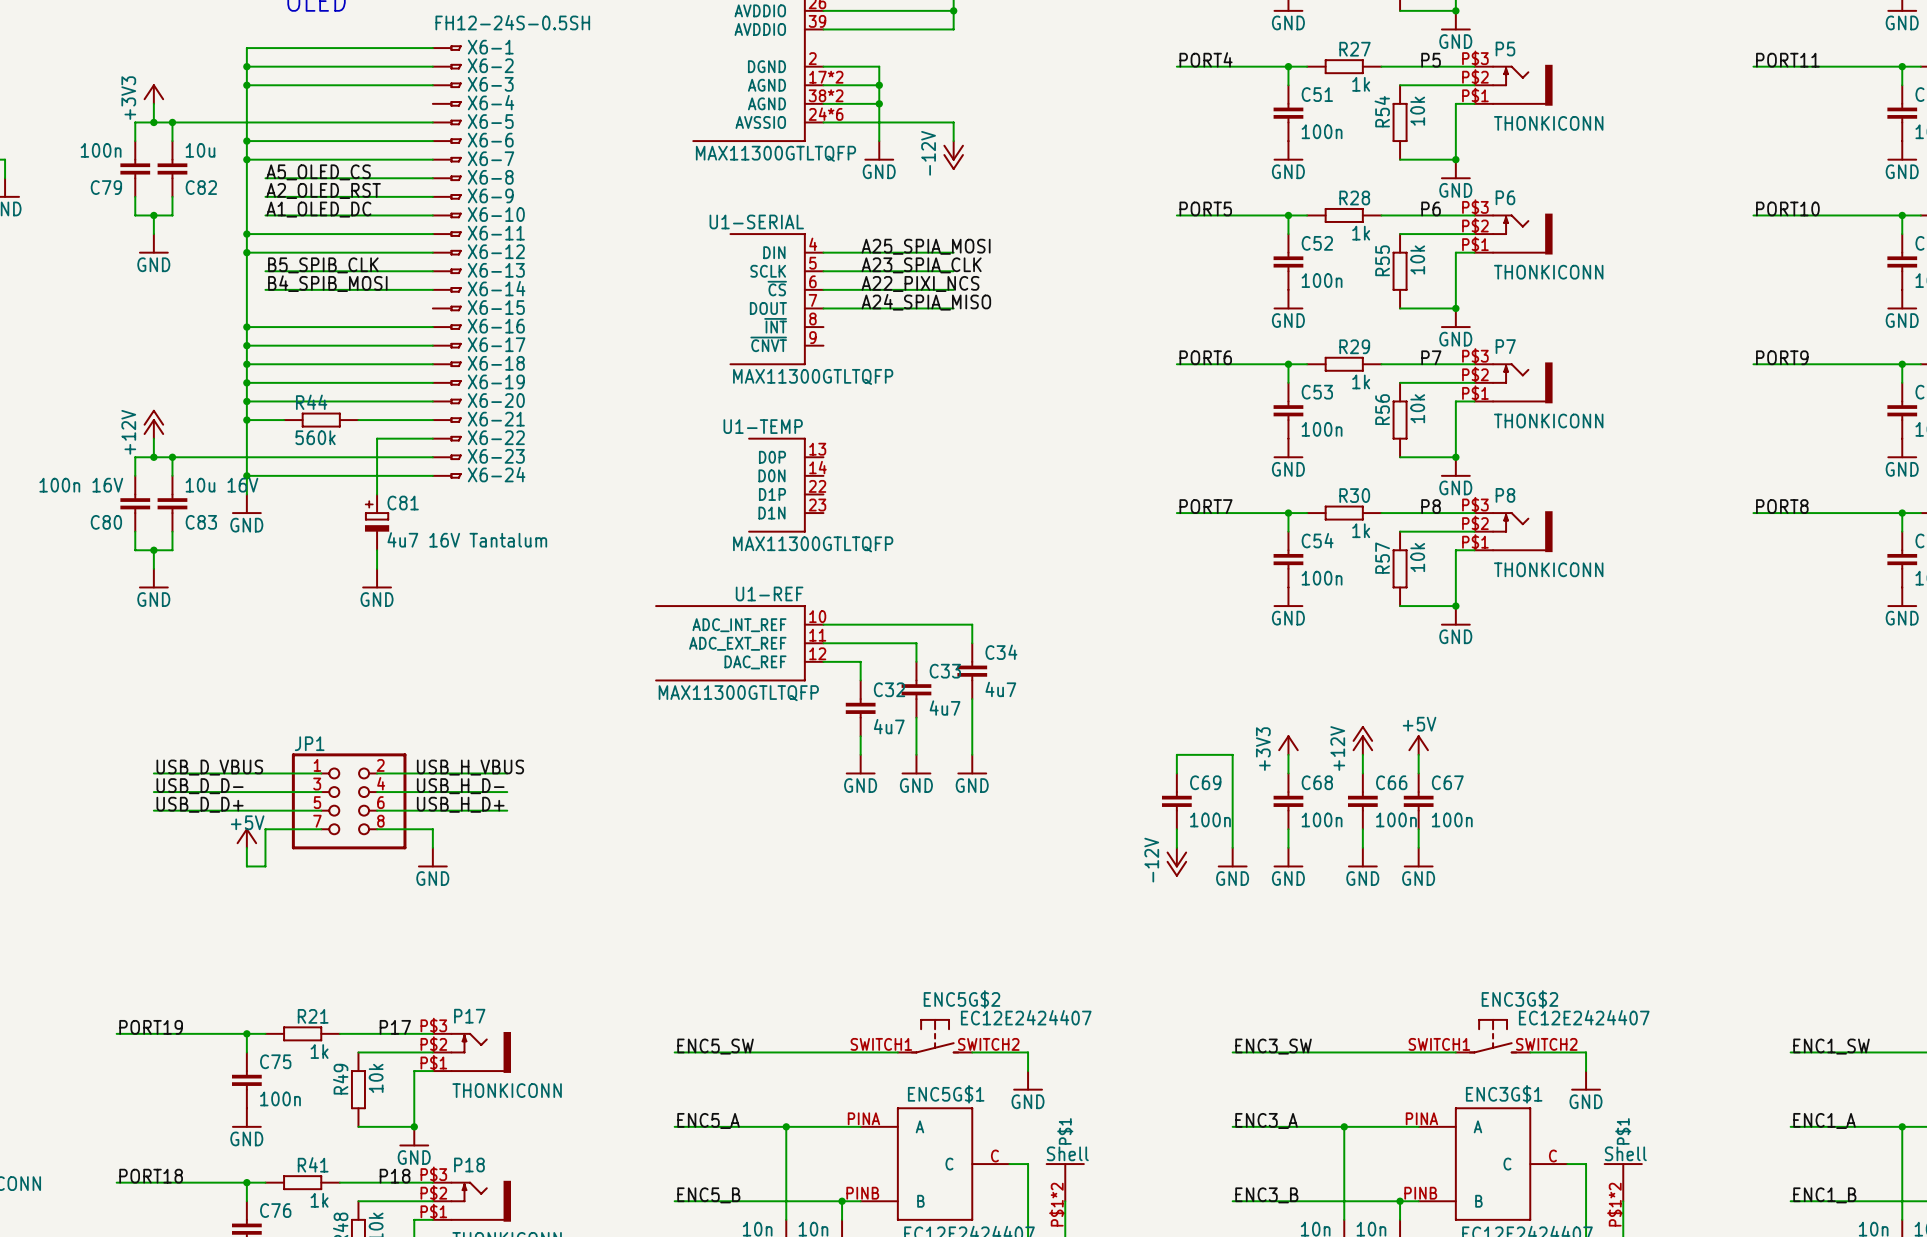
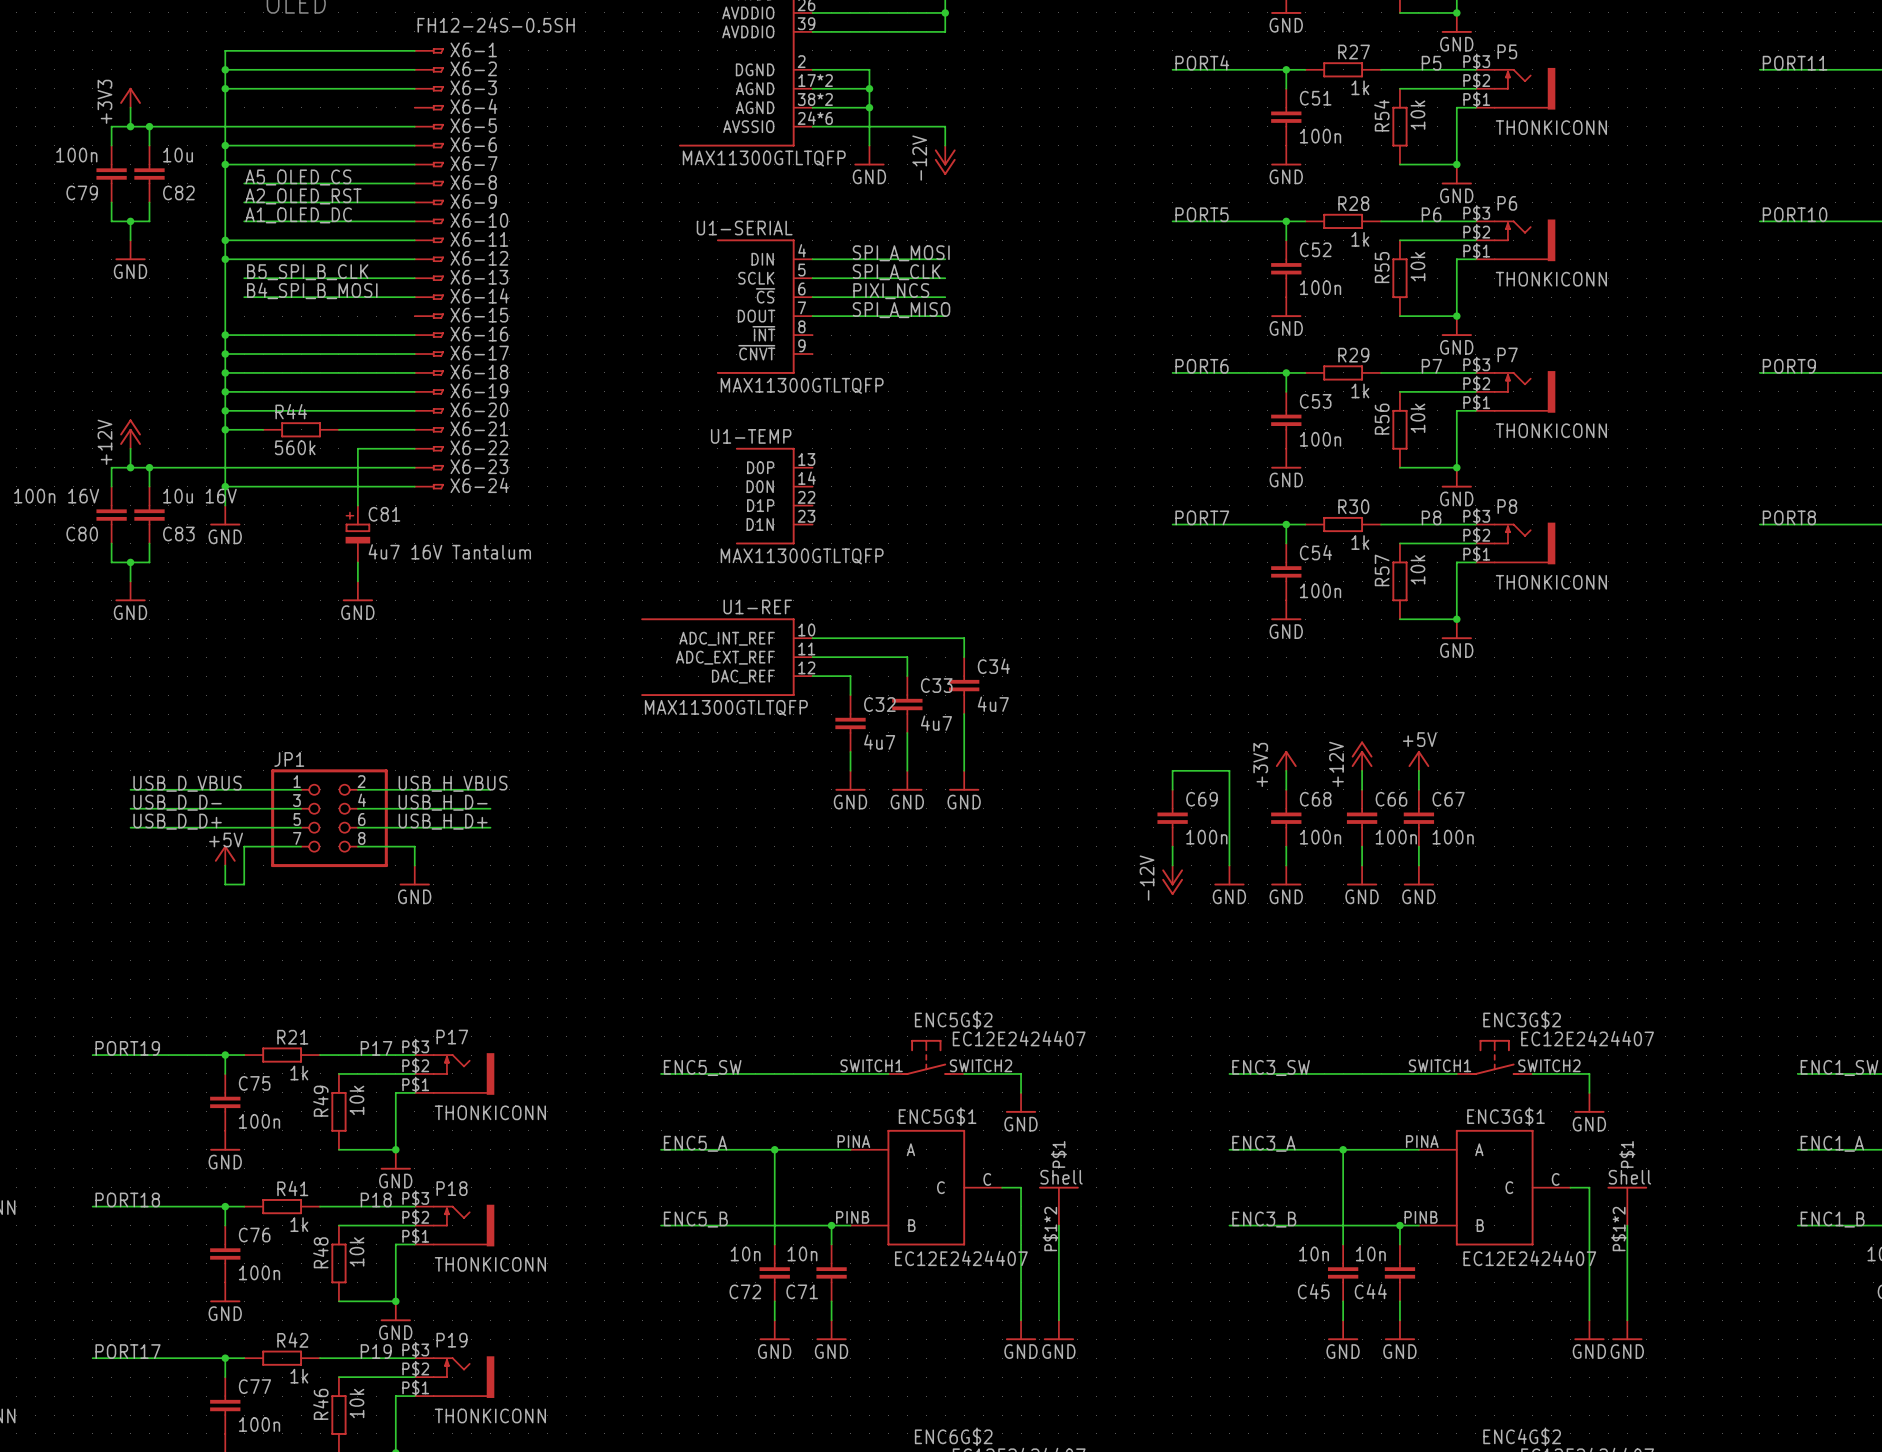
label: A25_SPIA_MOSI (926, 246) -> SPI_A_MOSI (901, 253)
label: B5_SPIB_CLK (323, 265) -> B5_SPI_B_CLK (307, 272)
label: A23_SPIA_CLK (921, 265) -> SPI_A_CLK (896, 272)
label: B4_SPIB_MOSI (327, 283) -> B4_SPI_B_MOSI (312, 290)
label: A22_PIXI_NCS (920, 283) -> PIXI_NCS (891, 291)
label: A24_SPIA_MISO (926, 302) -> SPI_A_MISO (901, 310)

